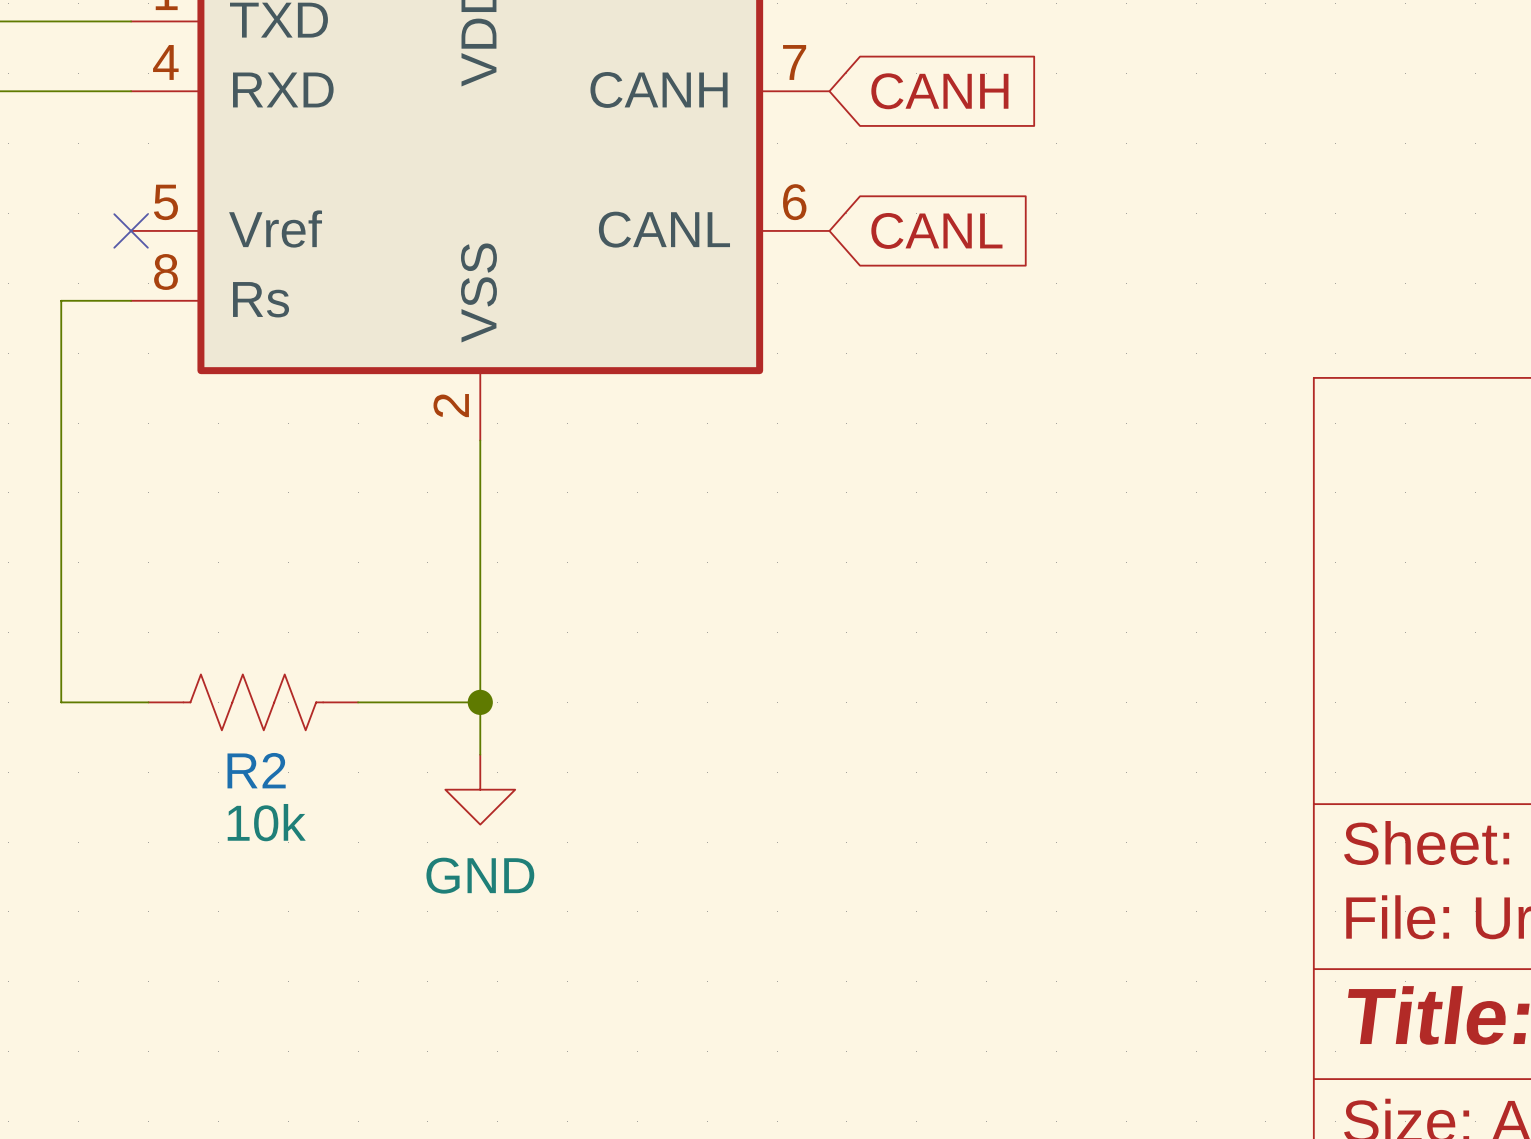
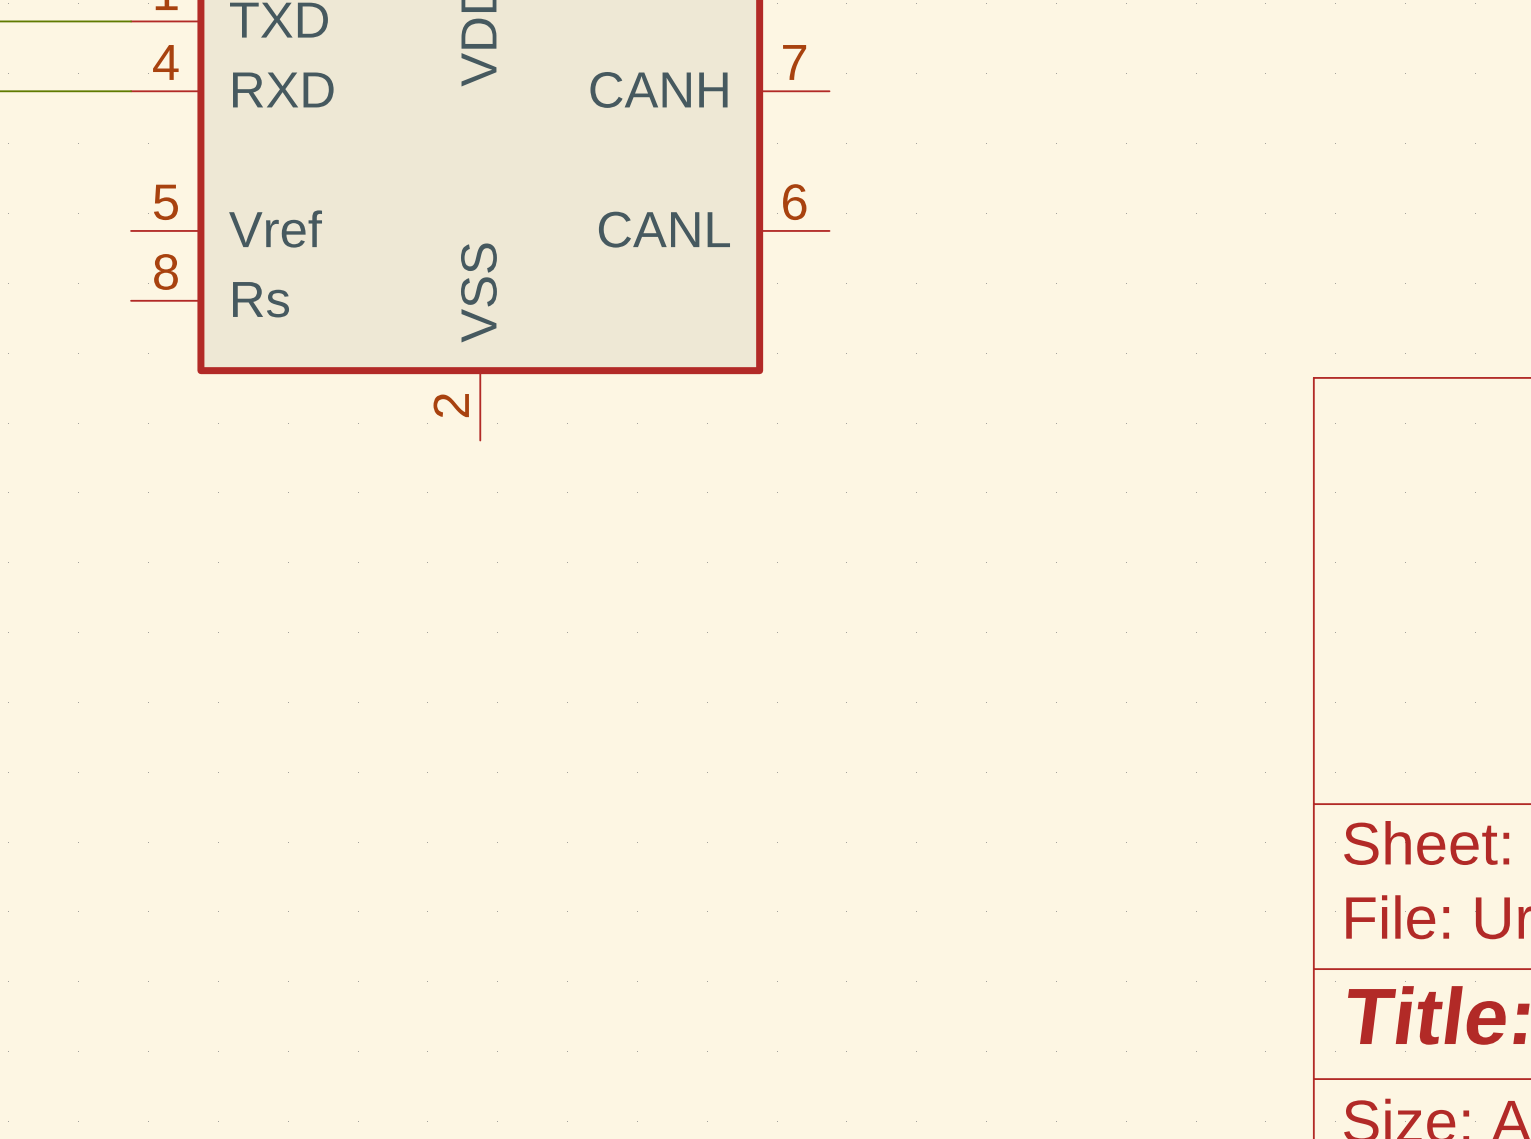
global label: CANH (939, 91) -> none
no-connect mark: (131, 230) -> none
global label: CANL (936, 230) -> none
wire: (131, 300) (61, 300) (61, 702) (148, 702) -> none
wire: (480, 440) (480, 754) -> none
R2: 10k (253, 702) -> none
wire: (358, 702) (480, 702) -> none
junction: (480, 702) -> none
power symbol: GND (480, 789) -> none

